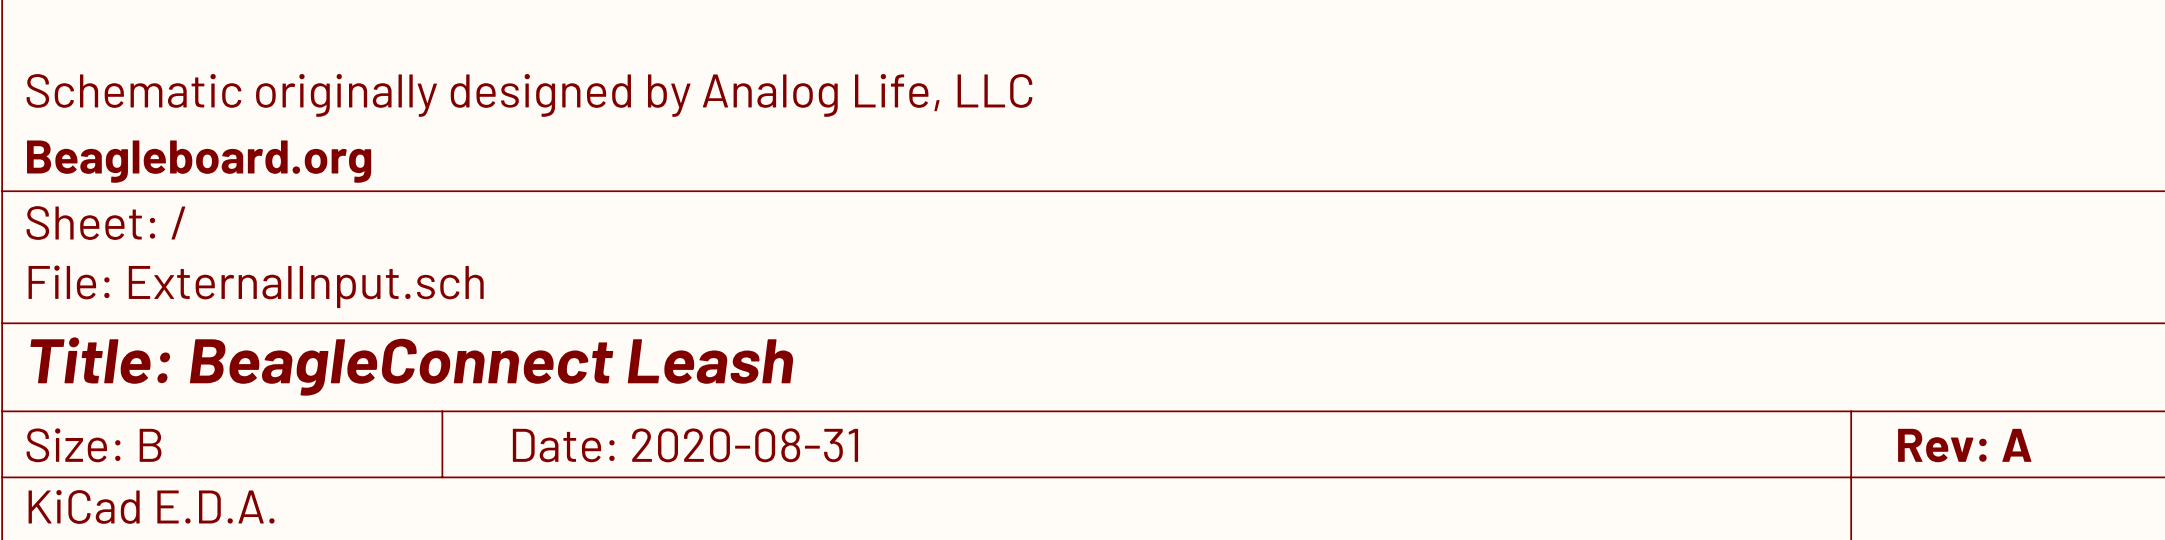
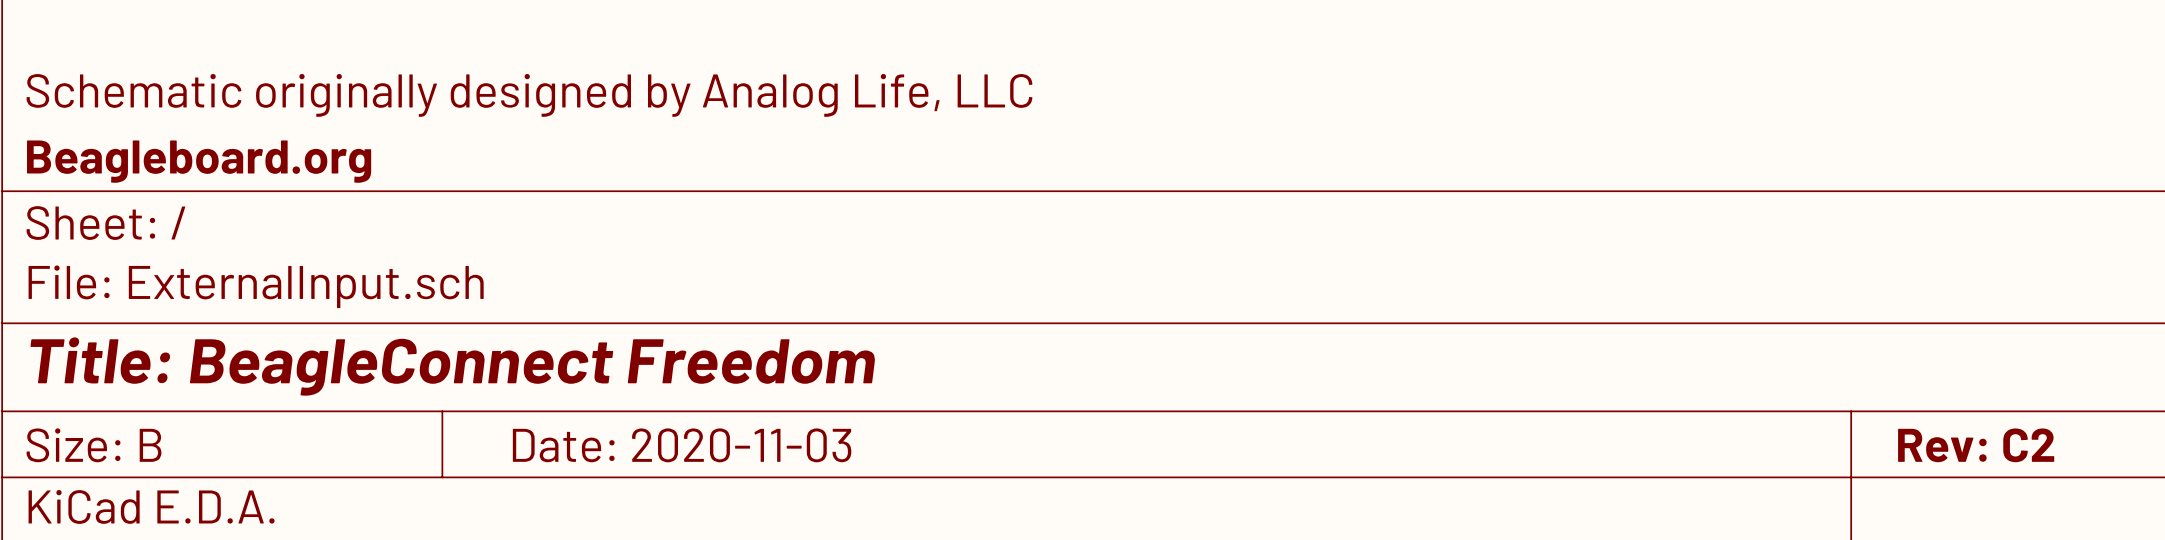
title block: Title: BeagleConnect Leash (412, 366) -> Title: BeagleConnect Freedom (452, 366)
title block: Date: 2020-08-31 (685, 445) -> Date: 2020-11-03 (682, 445)
title block: Rev: A (1964, 445) -> Rev: C2 (1976, 445)

